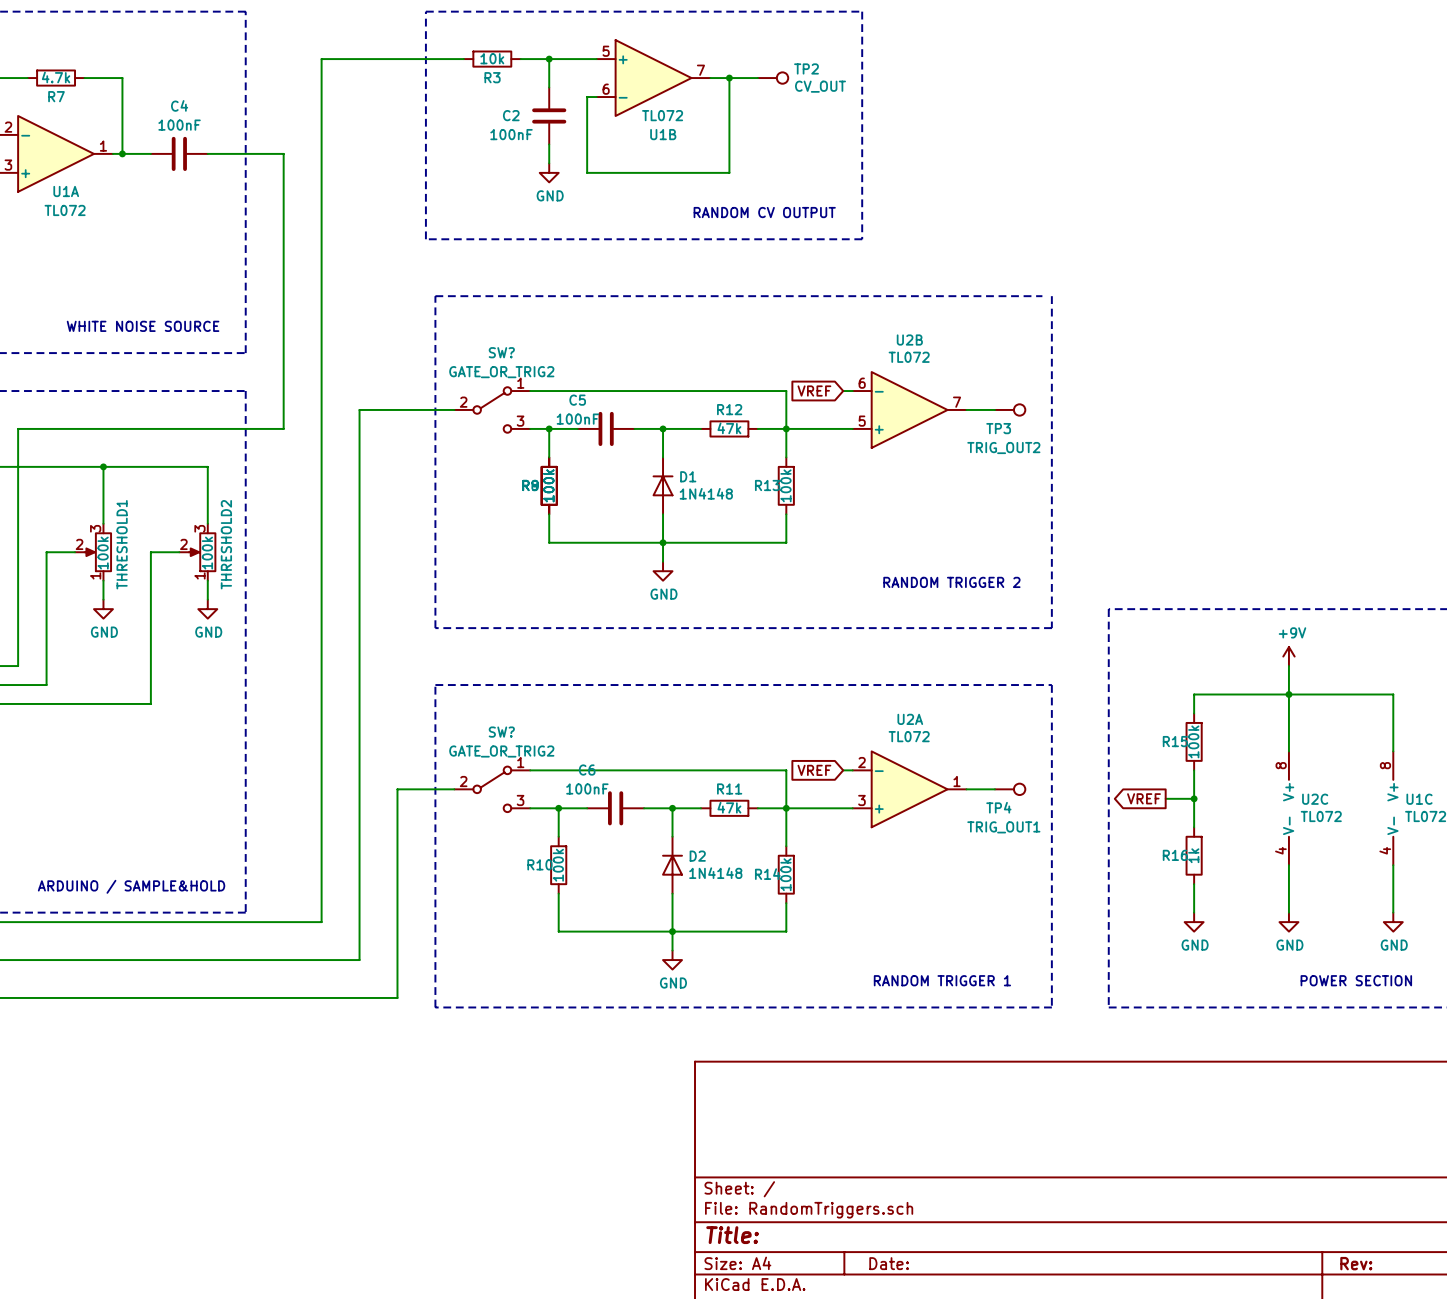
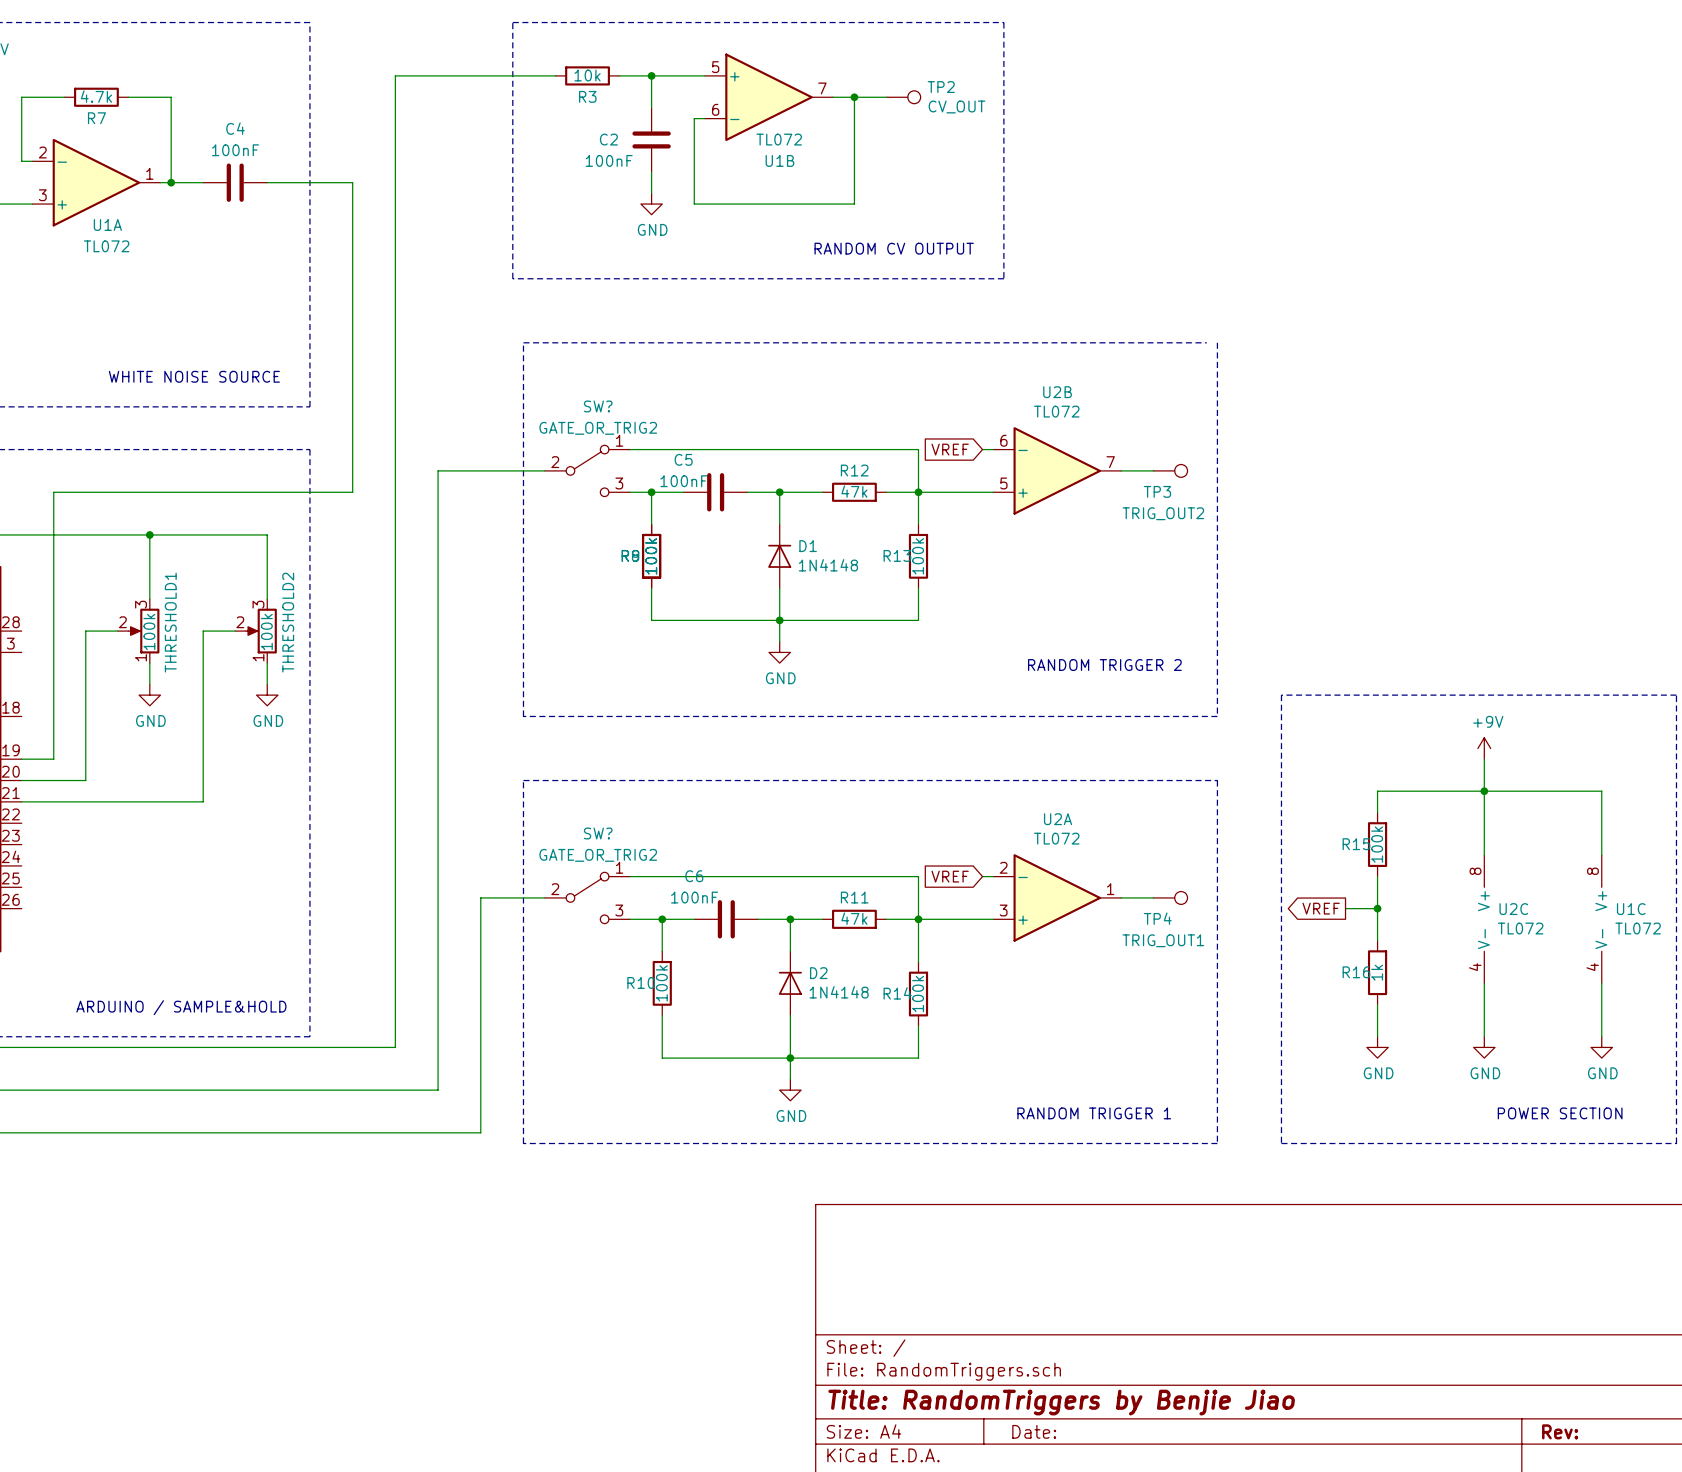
title block: Title: (732, 1235) -> Title: RandomTriggers by Benjie Jiao (1061, 1402)

